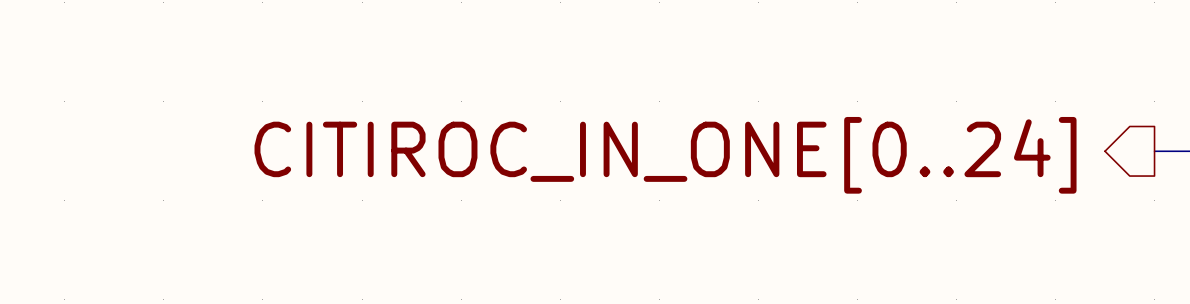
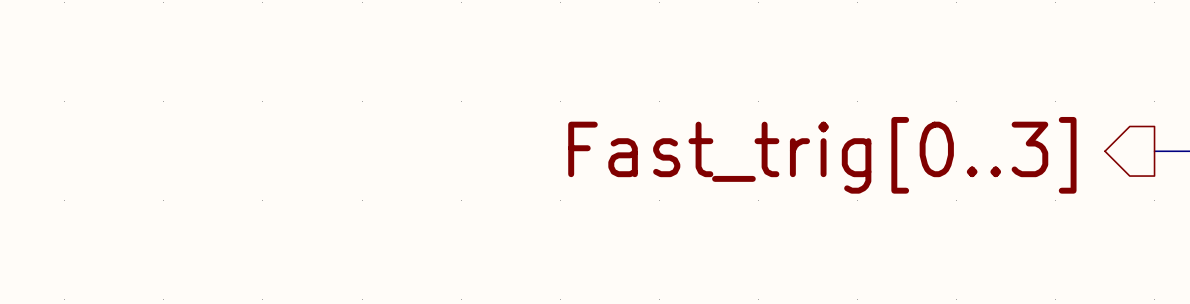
hierarchical label: CITIROC_IN_ONE[0..24] (665, 155) -> Fast_trig[0..3] (822, 155)

